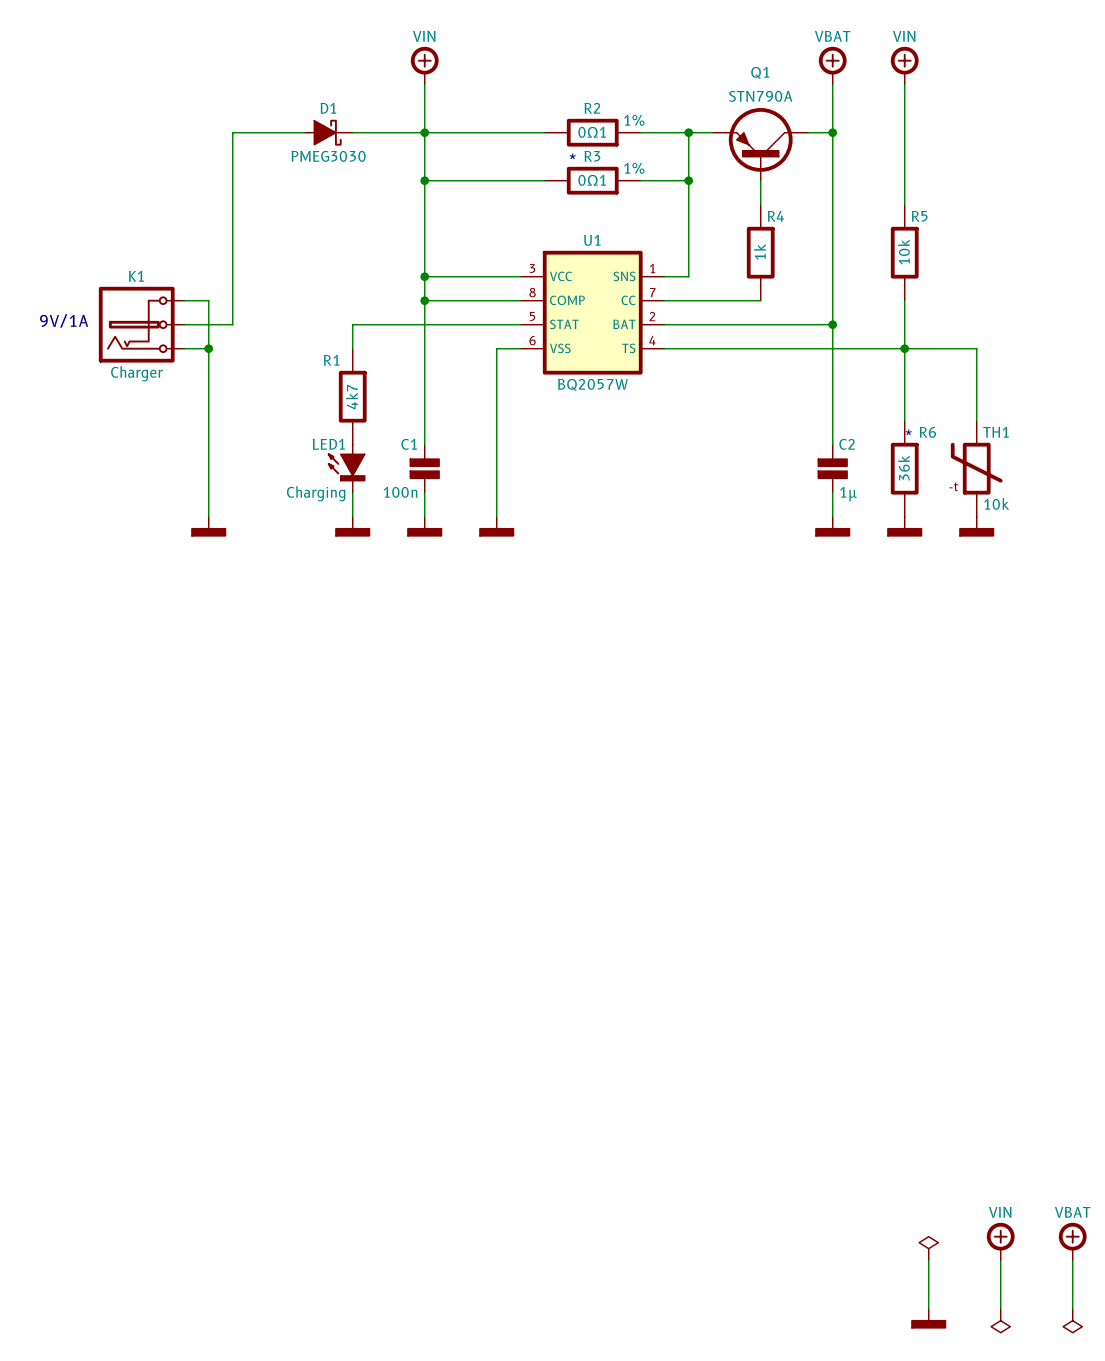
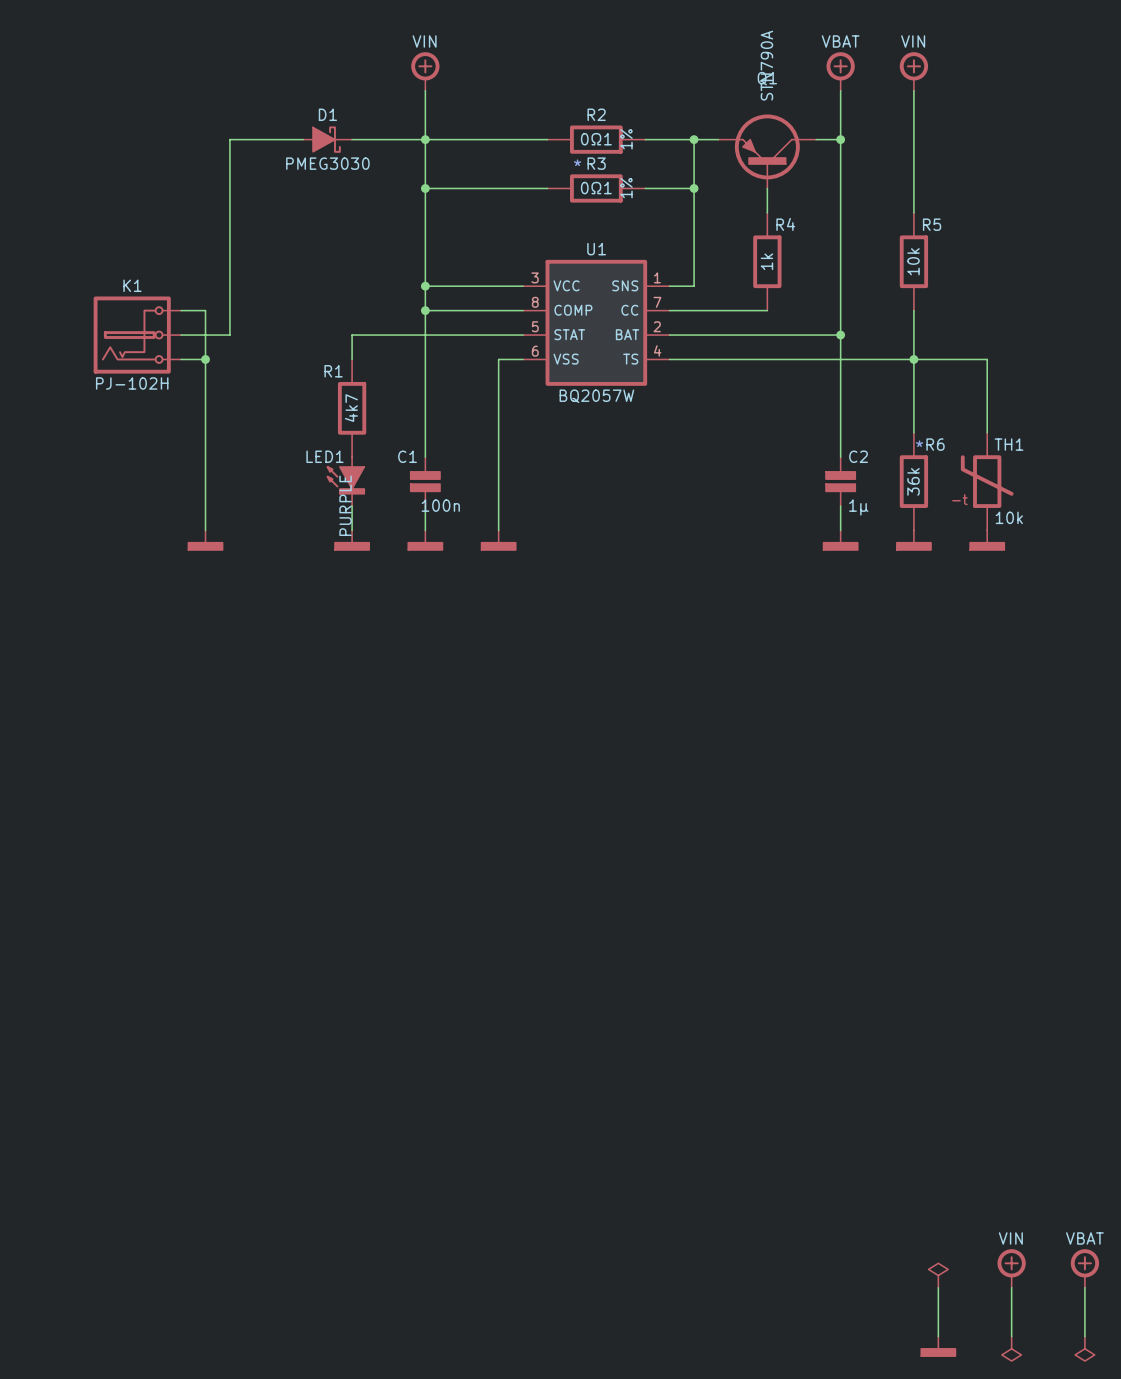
Q1 value rotation: 0° (760, 96) -> 90° counterclockwise (766, 65)
R2 text rotation: 0° (634, 120) -> 90° counterclockwise (626, 139)
R3 text rotation: 0° (634, 168) -> 90° counterclockwise (626, 188)
text: 9V/1A (64, 320) -> none
K1 value: Charger (137, 373) -> PJ-102H (132, 383)
C1 value position: 100n (400, 492) -> 100n (440, 505)
LED1 value: Charging (316, 493) -> PURPLE (345, 505)

